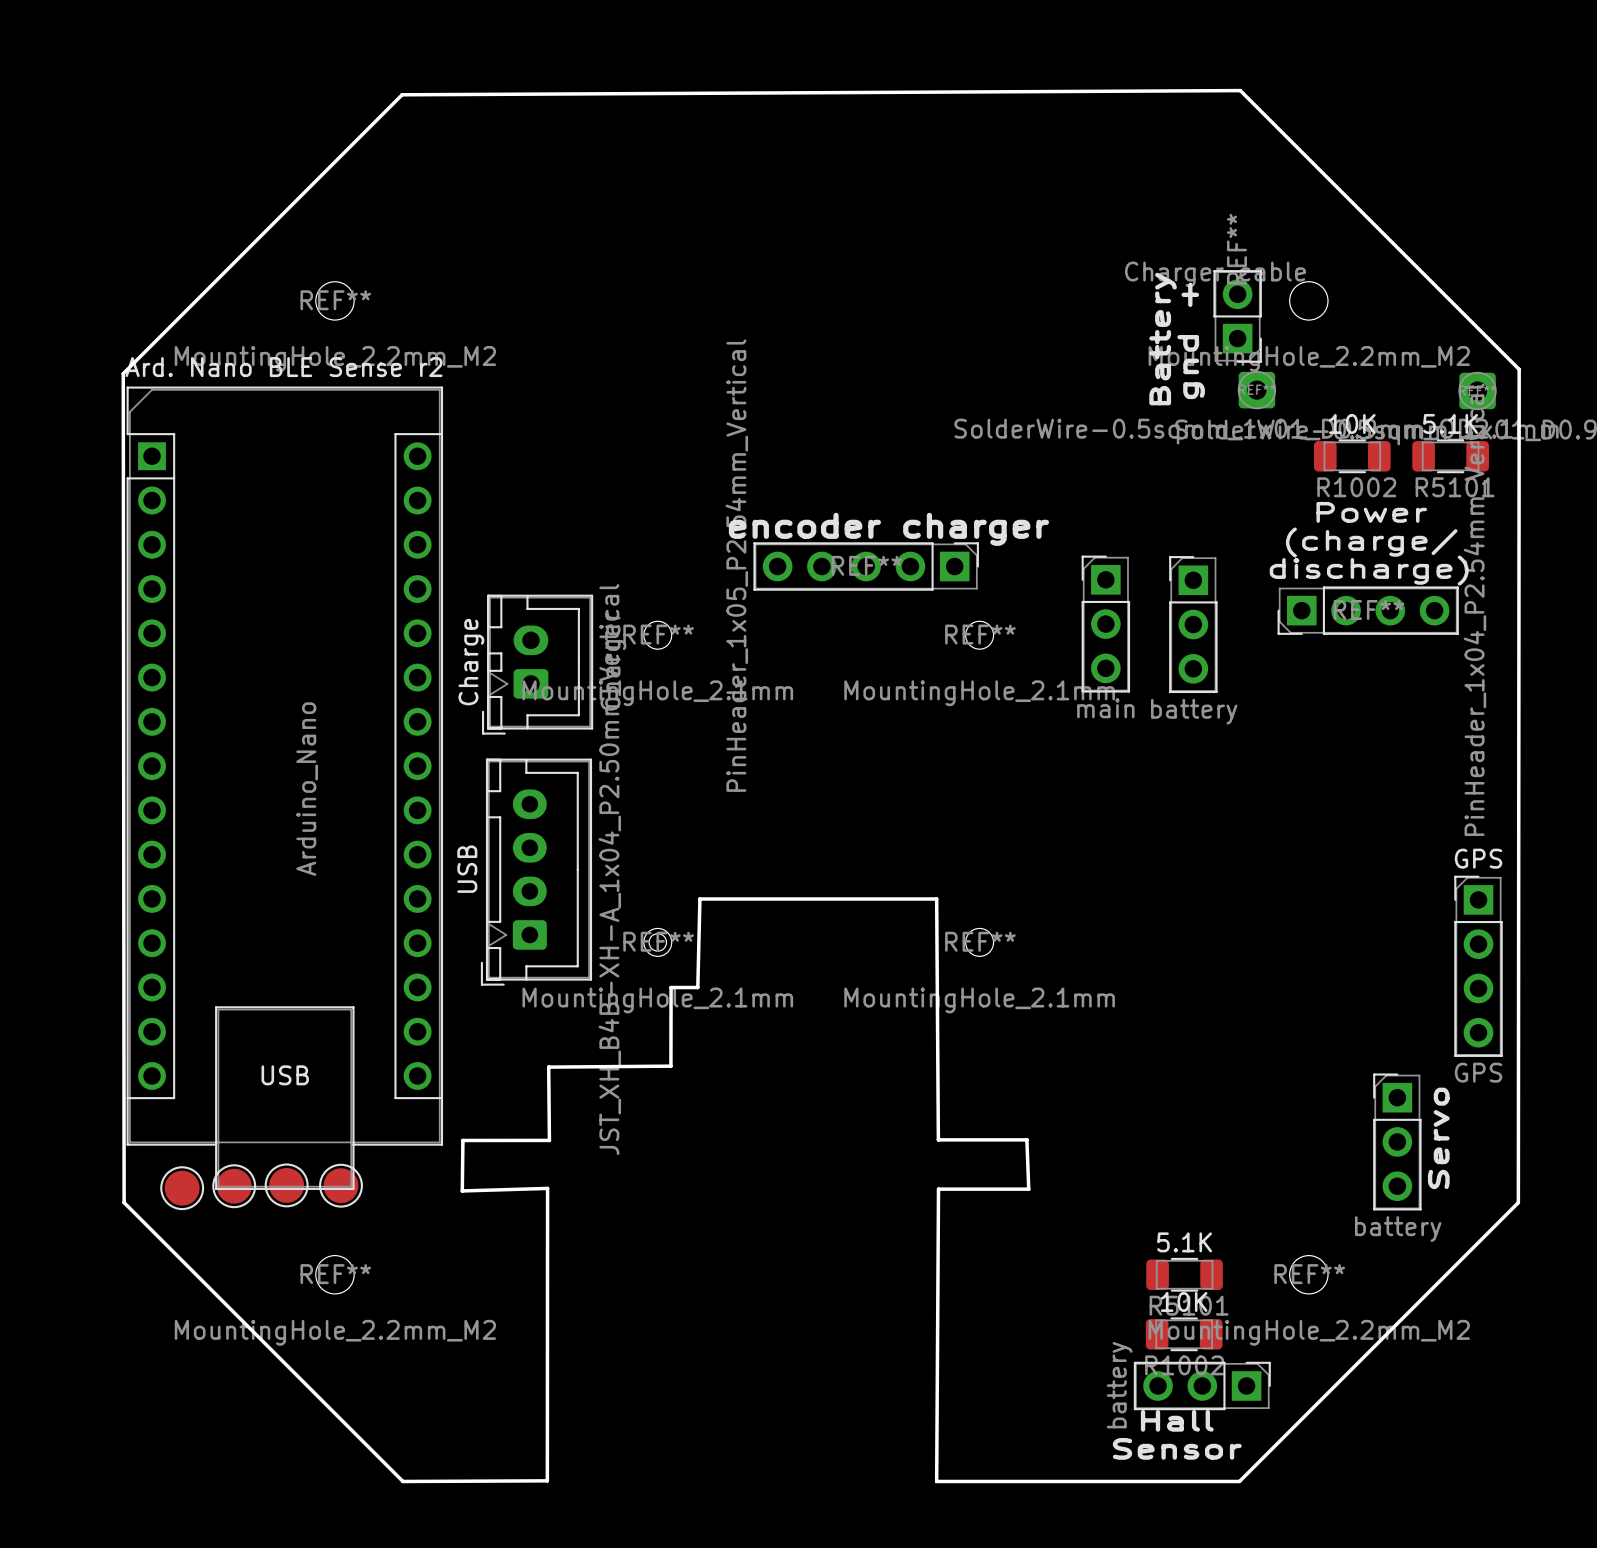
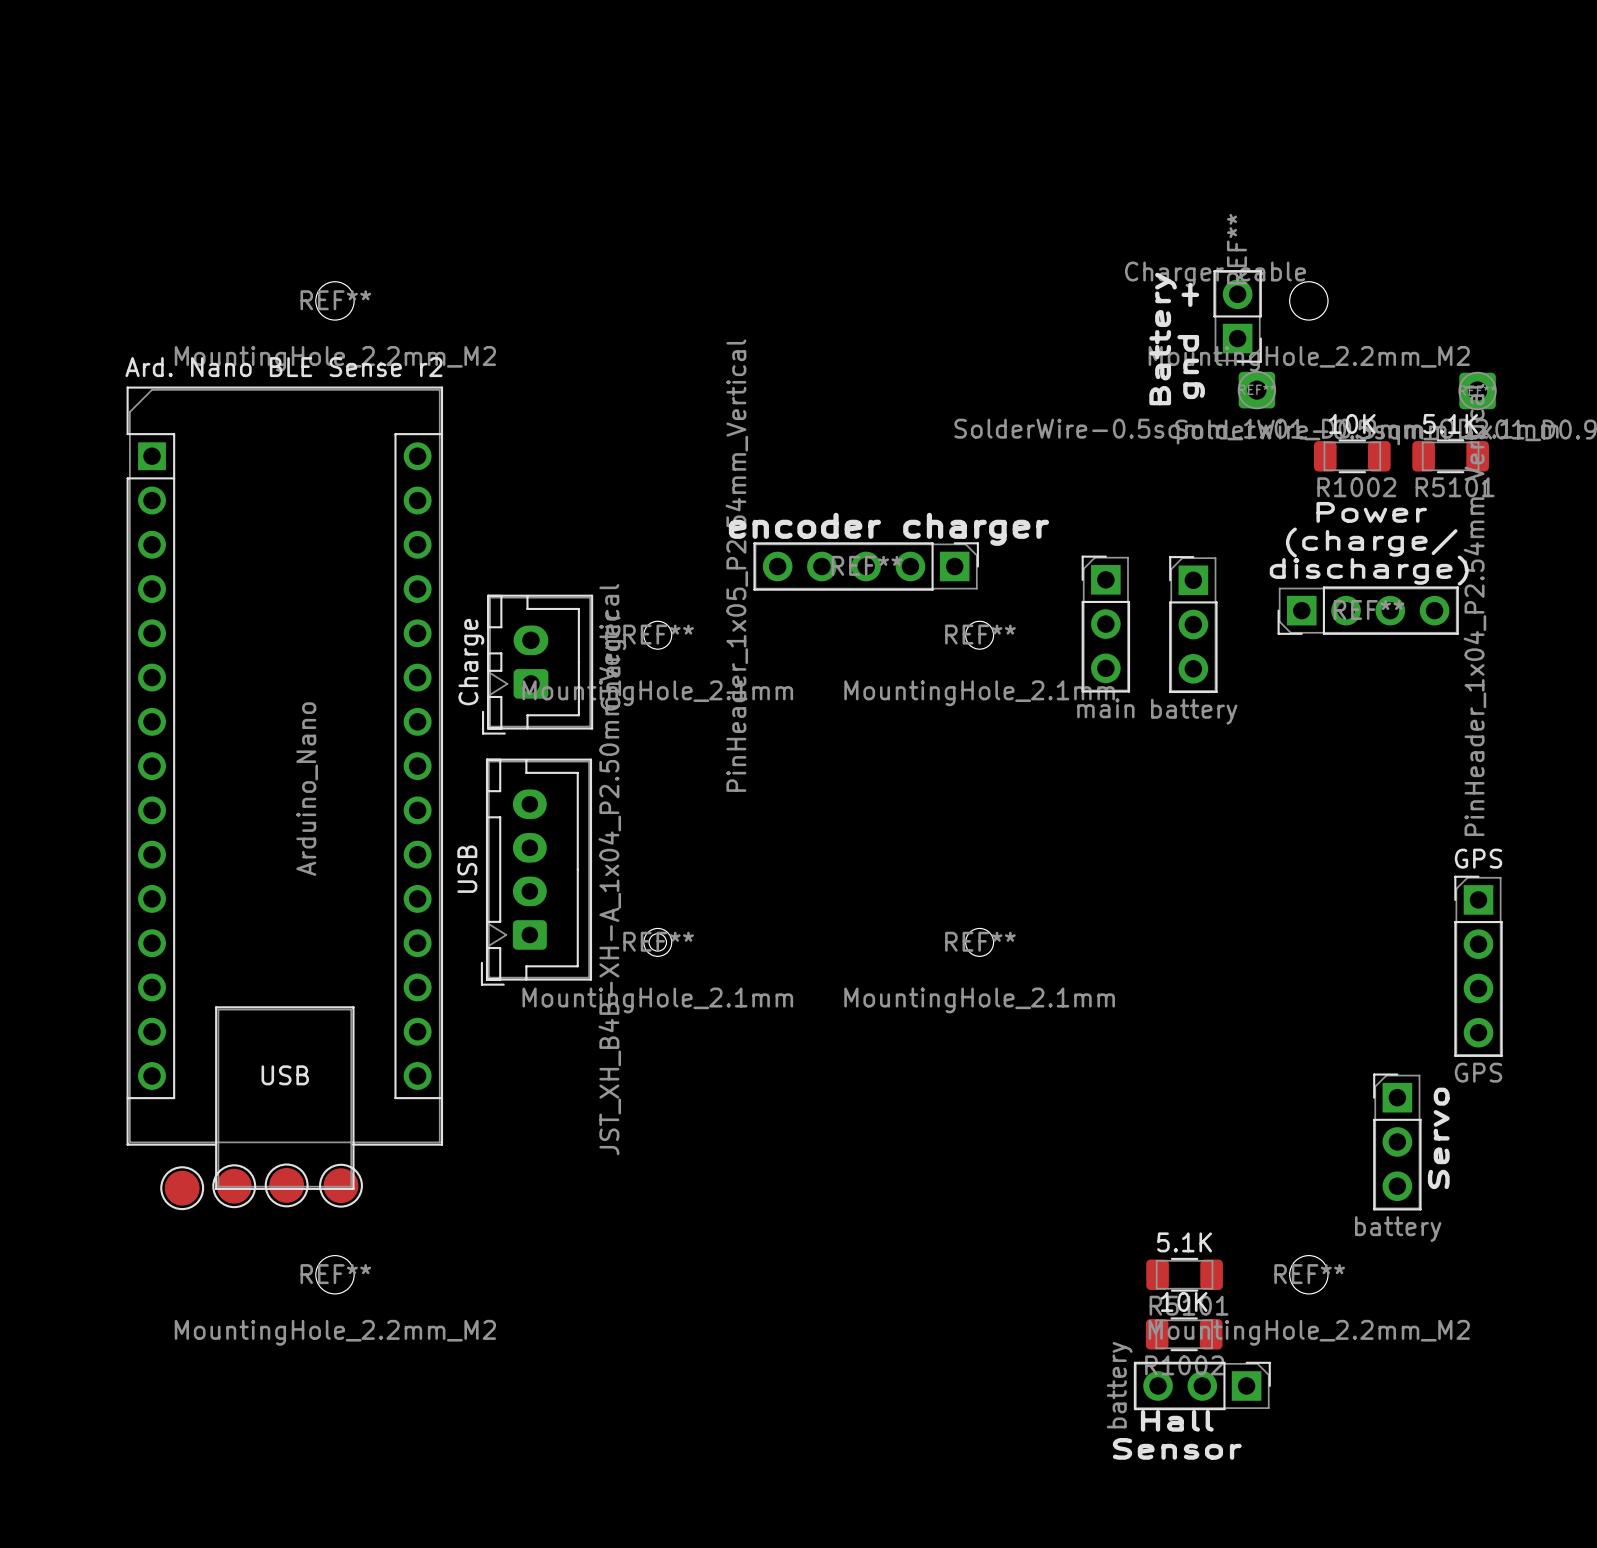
board edge: (1240, 90) (402, 94) (123, 373) (124, 1202) (402, 1481) (547, 1480) (547, 1188) (462, 1190) (462, 1140) (549, 1140) (548, 1067) (670, 1066) (671, 987) (697, 987) (699, 898) (936, 898) (938, 1139) (1026, 1139) (1028, 1189) (938, 1189) (936, 1481) (1239, 1481) (1518, 1202) (1519, 369) (1240, 90) -> none

